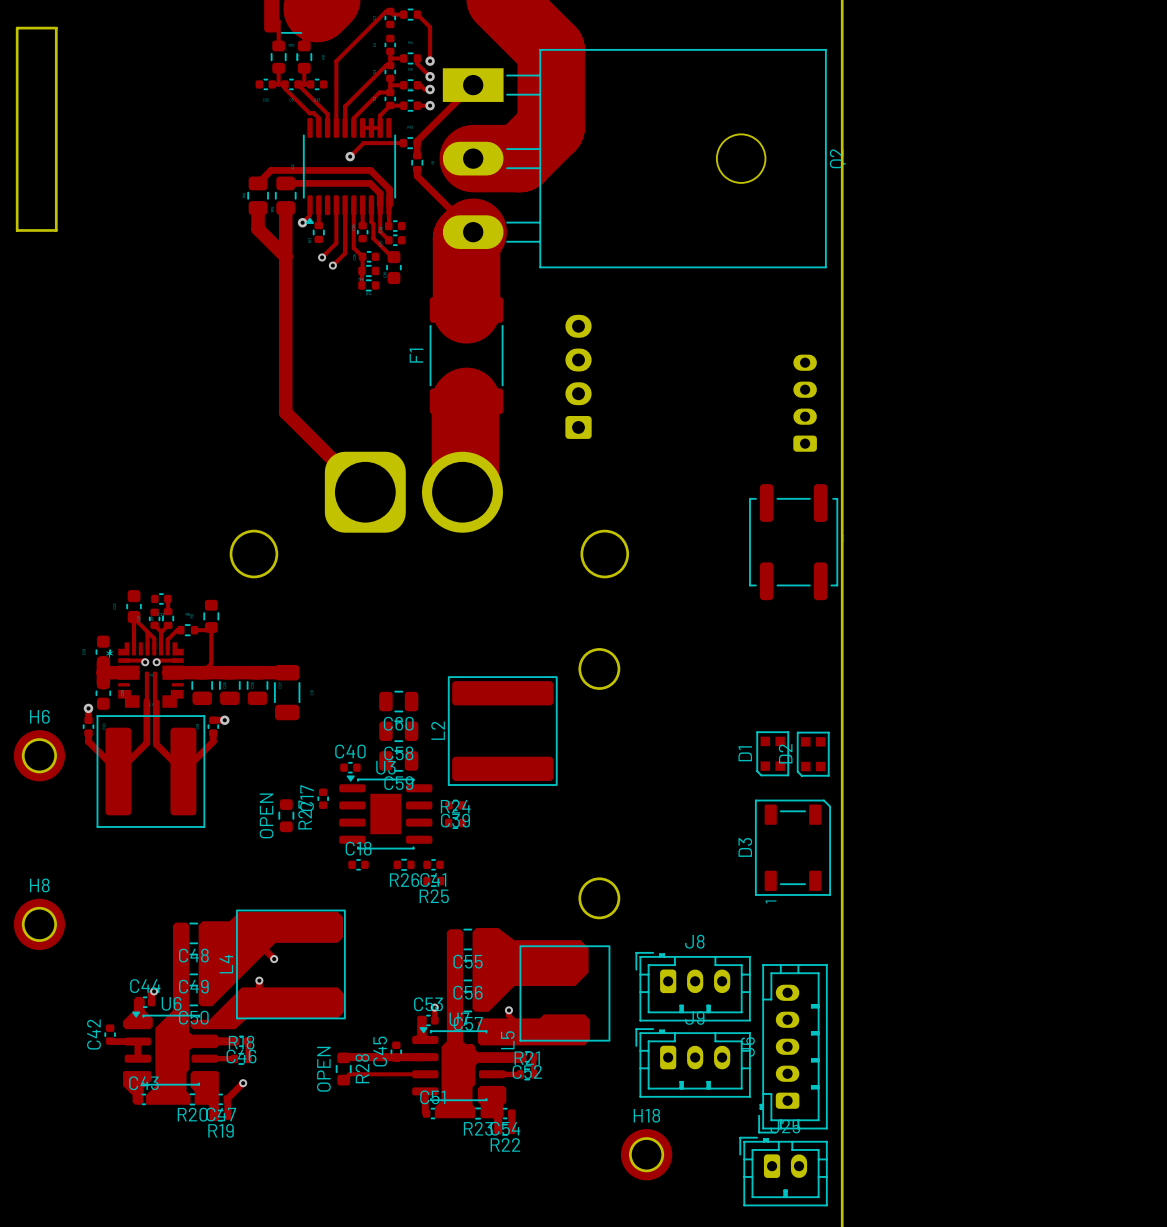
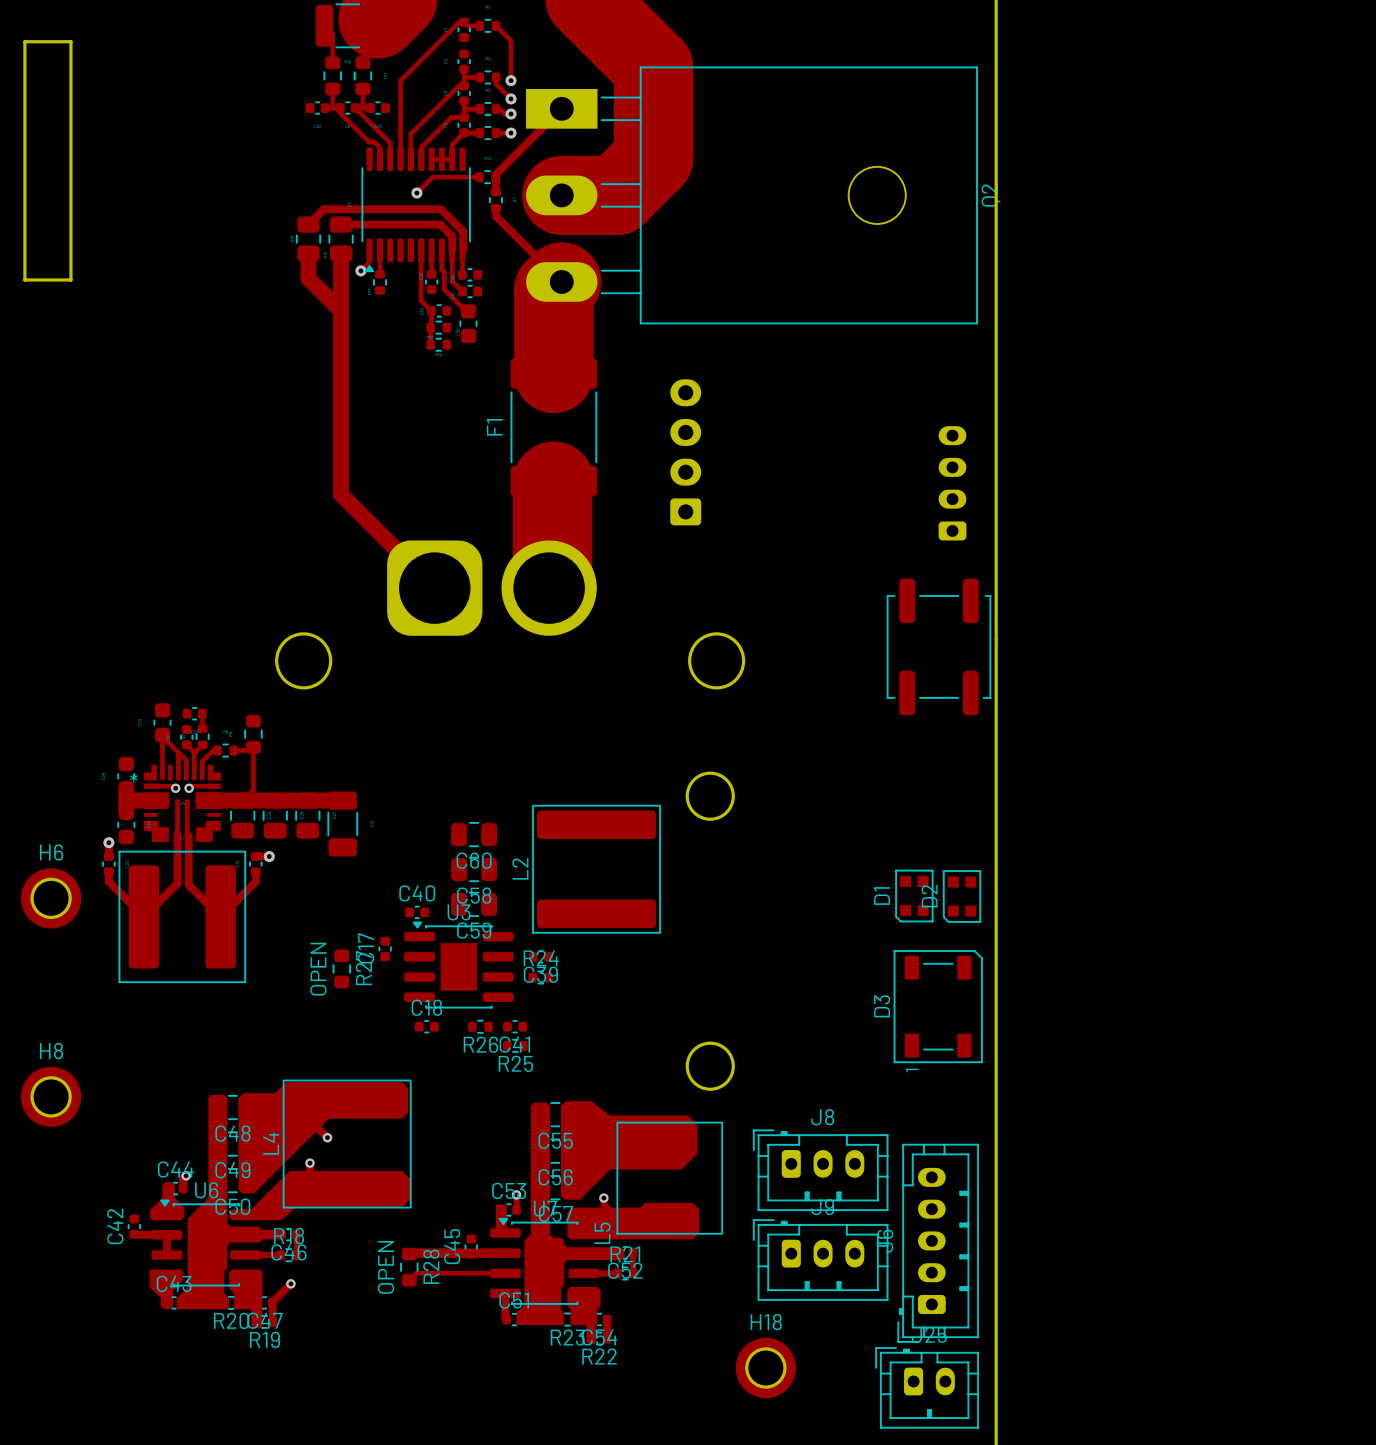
track: (336, 205) (336, 243) (322, 257) -> none
track: (345, 205) (345, 253) (332, 265) -> none
via: (322, 257) -> none
via: (332, 265) -> none

